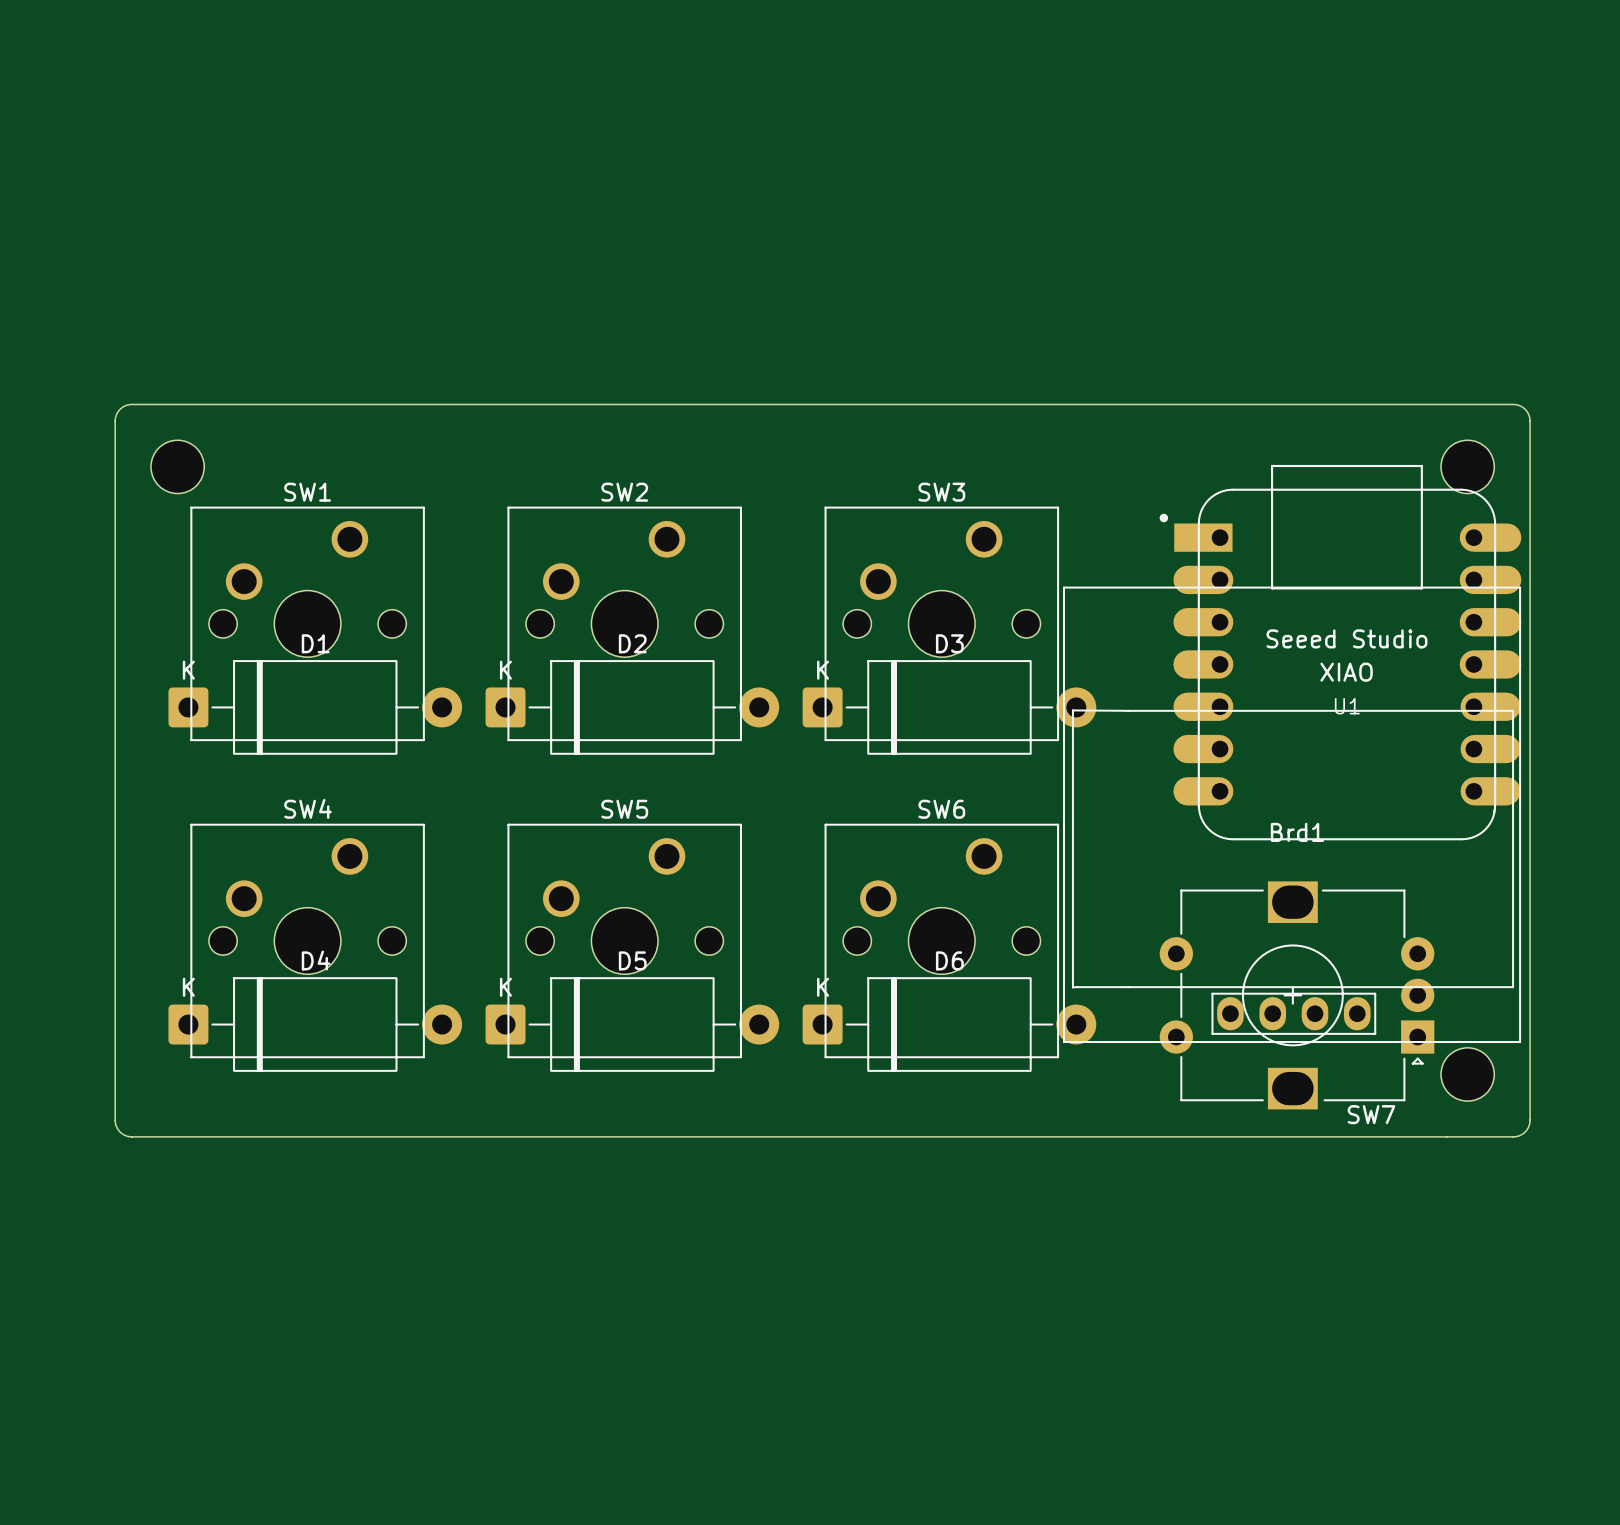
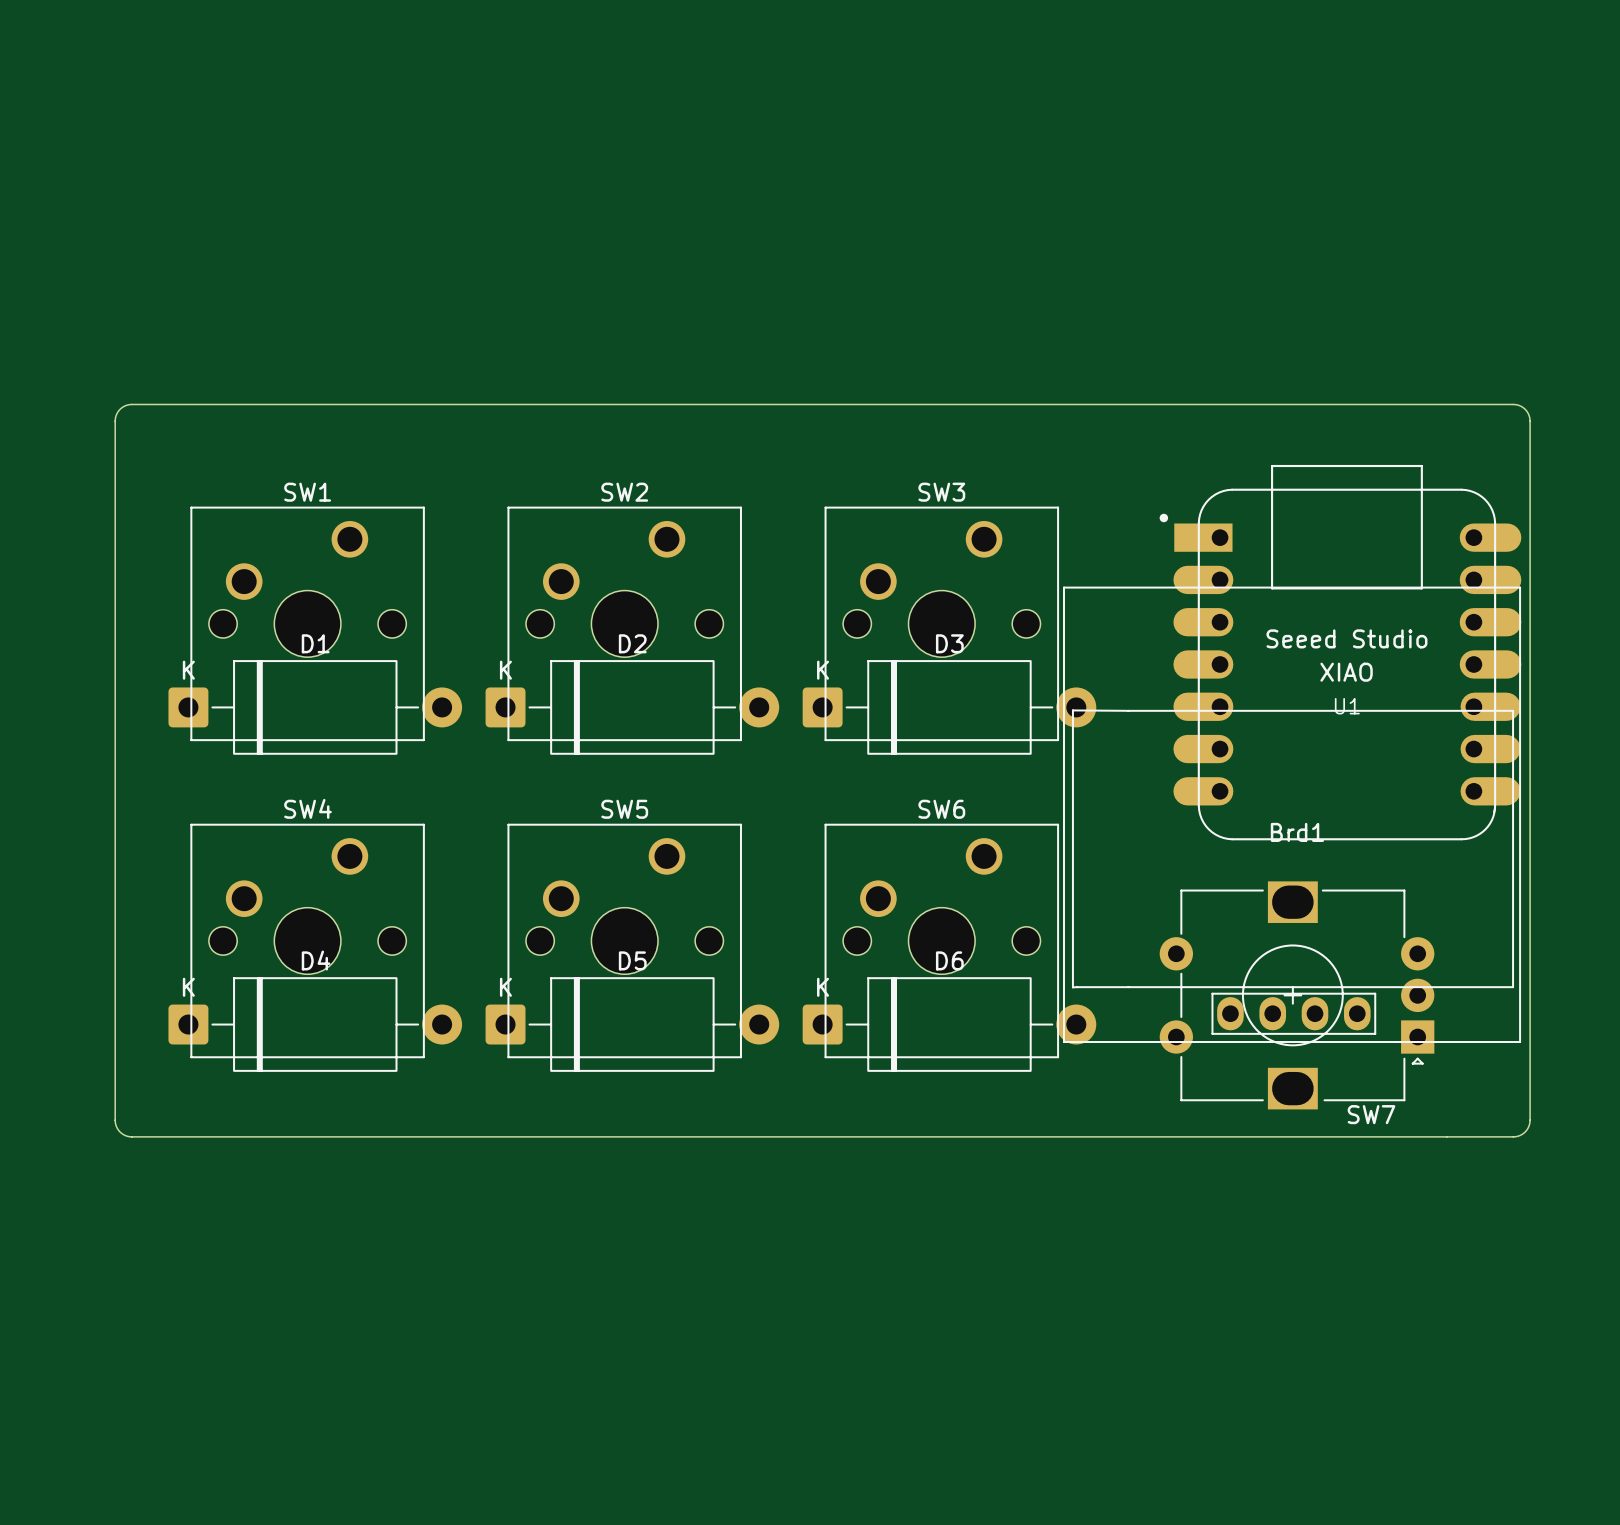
part: (177, 466) -> none
part: (1467, 466) -> none
part: (1467, 1074) -> none

